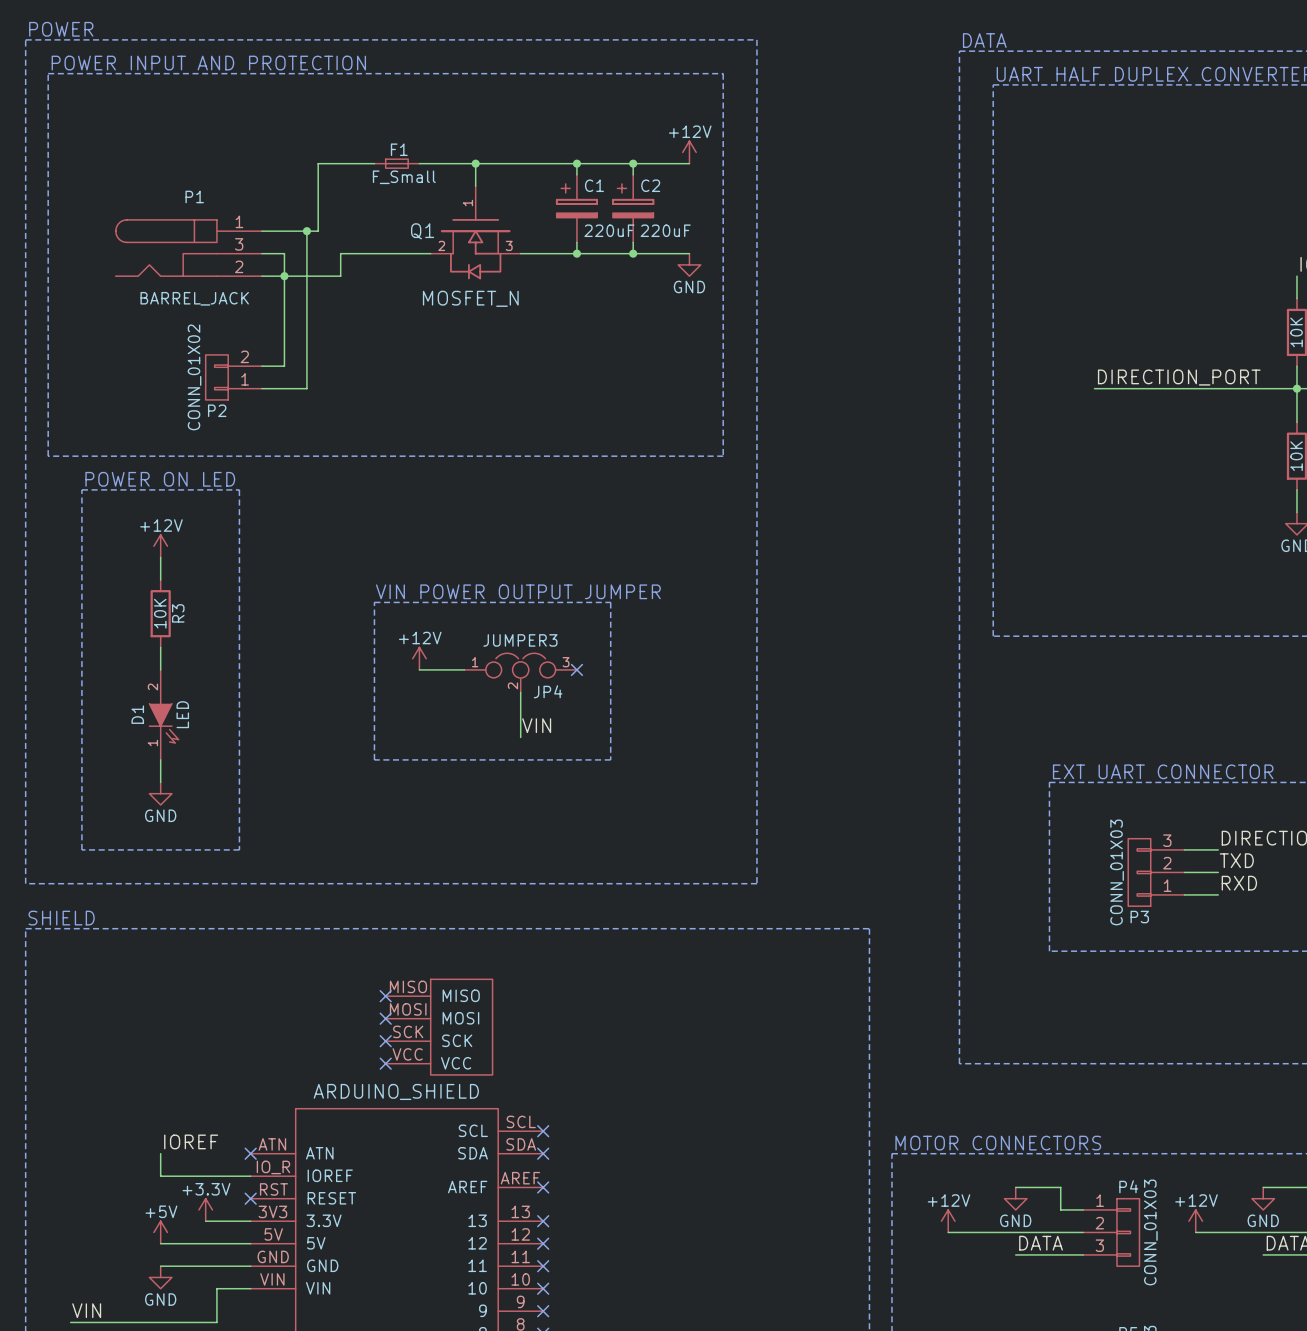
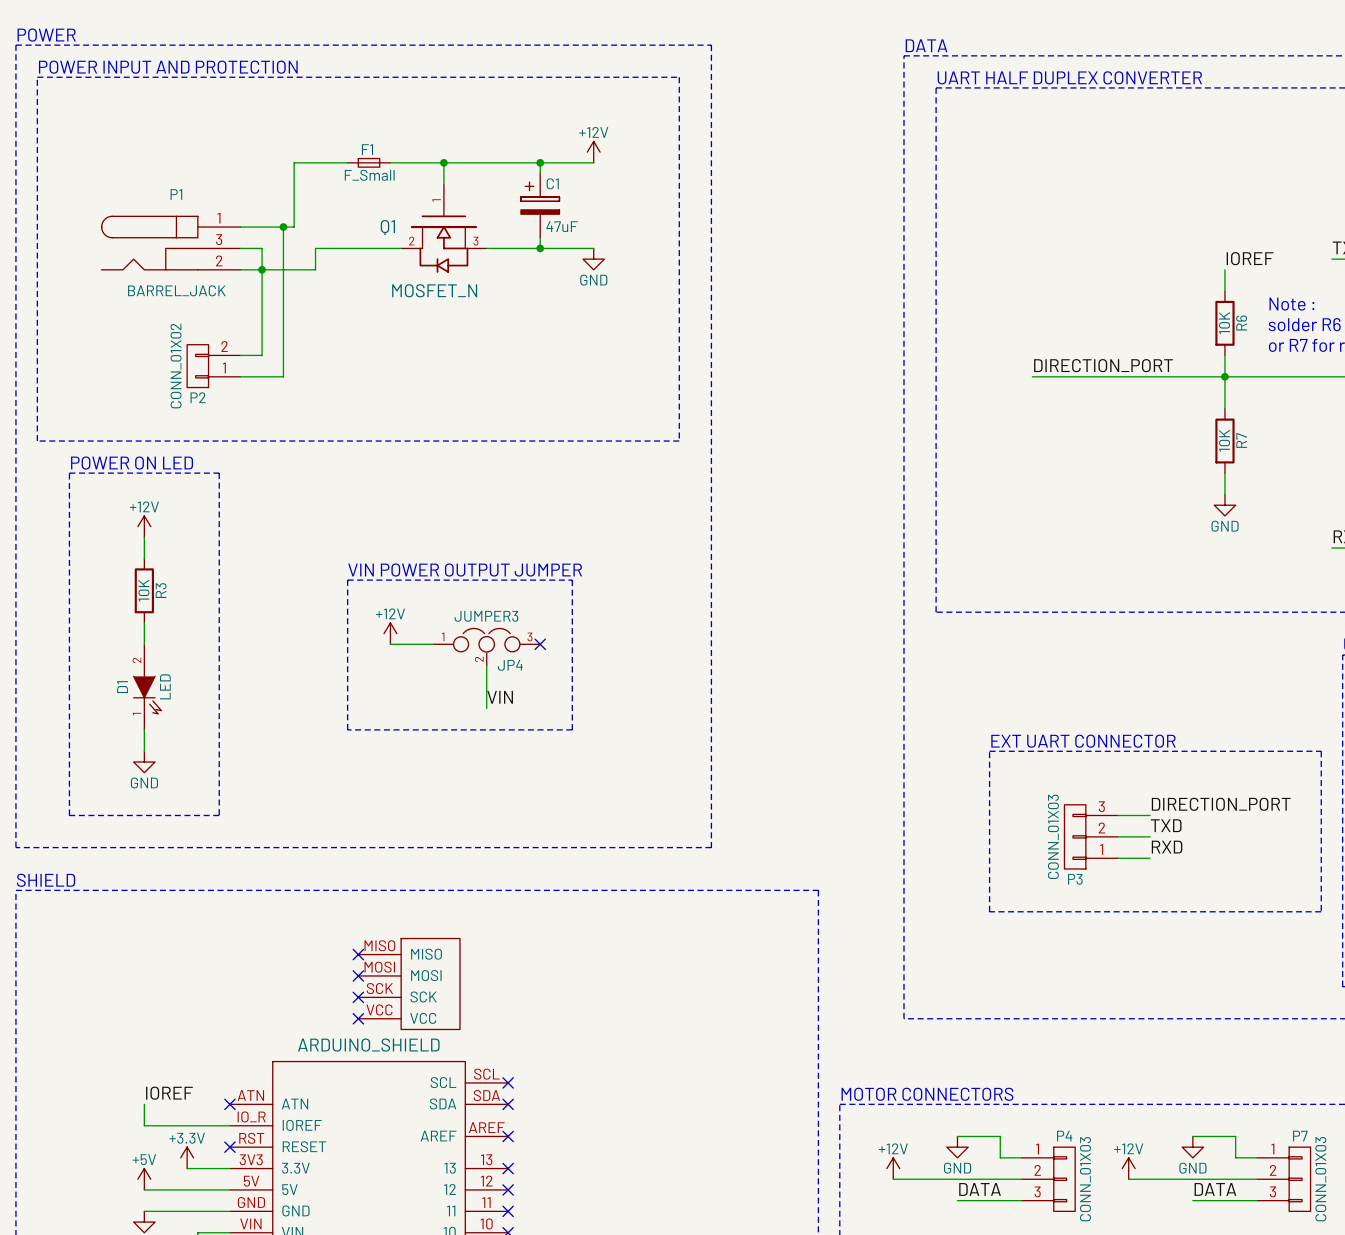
power symbol position: +12V (689, 152) -> +12V (593, 152)
junction: (633, 163) -> none
wire: (689, 163) (633, 163) (633, 174) -> none
C2: 220uF (633, 208) -> none
C1 value: 220uF (609, 230) -> 47uF (562, 226)
wire: (633, 242) (633, 253) (689, 253) -> none
junction: (633, 253) -> none
power symbol position: GND (689, 264) -> GND (593, 259)

